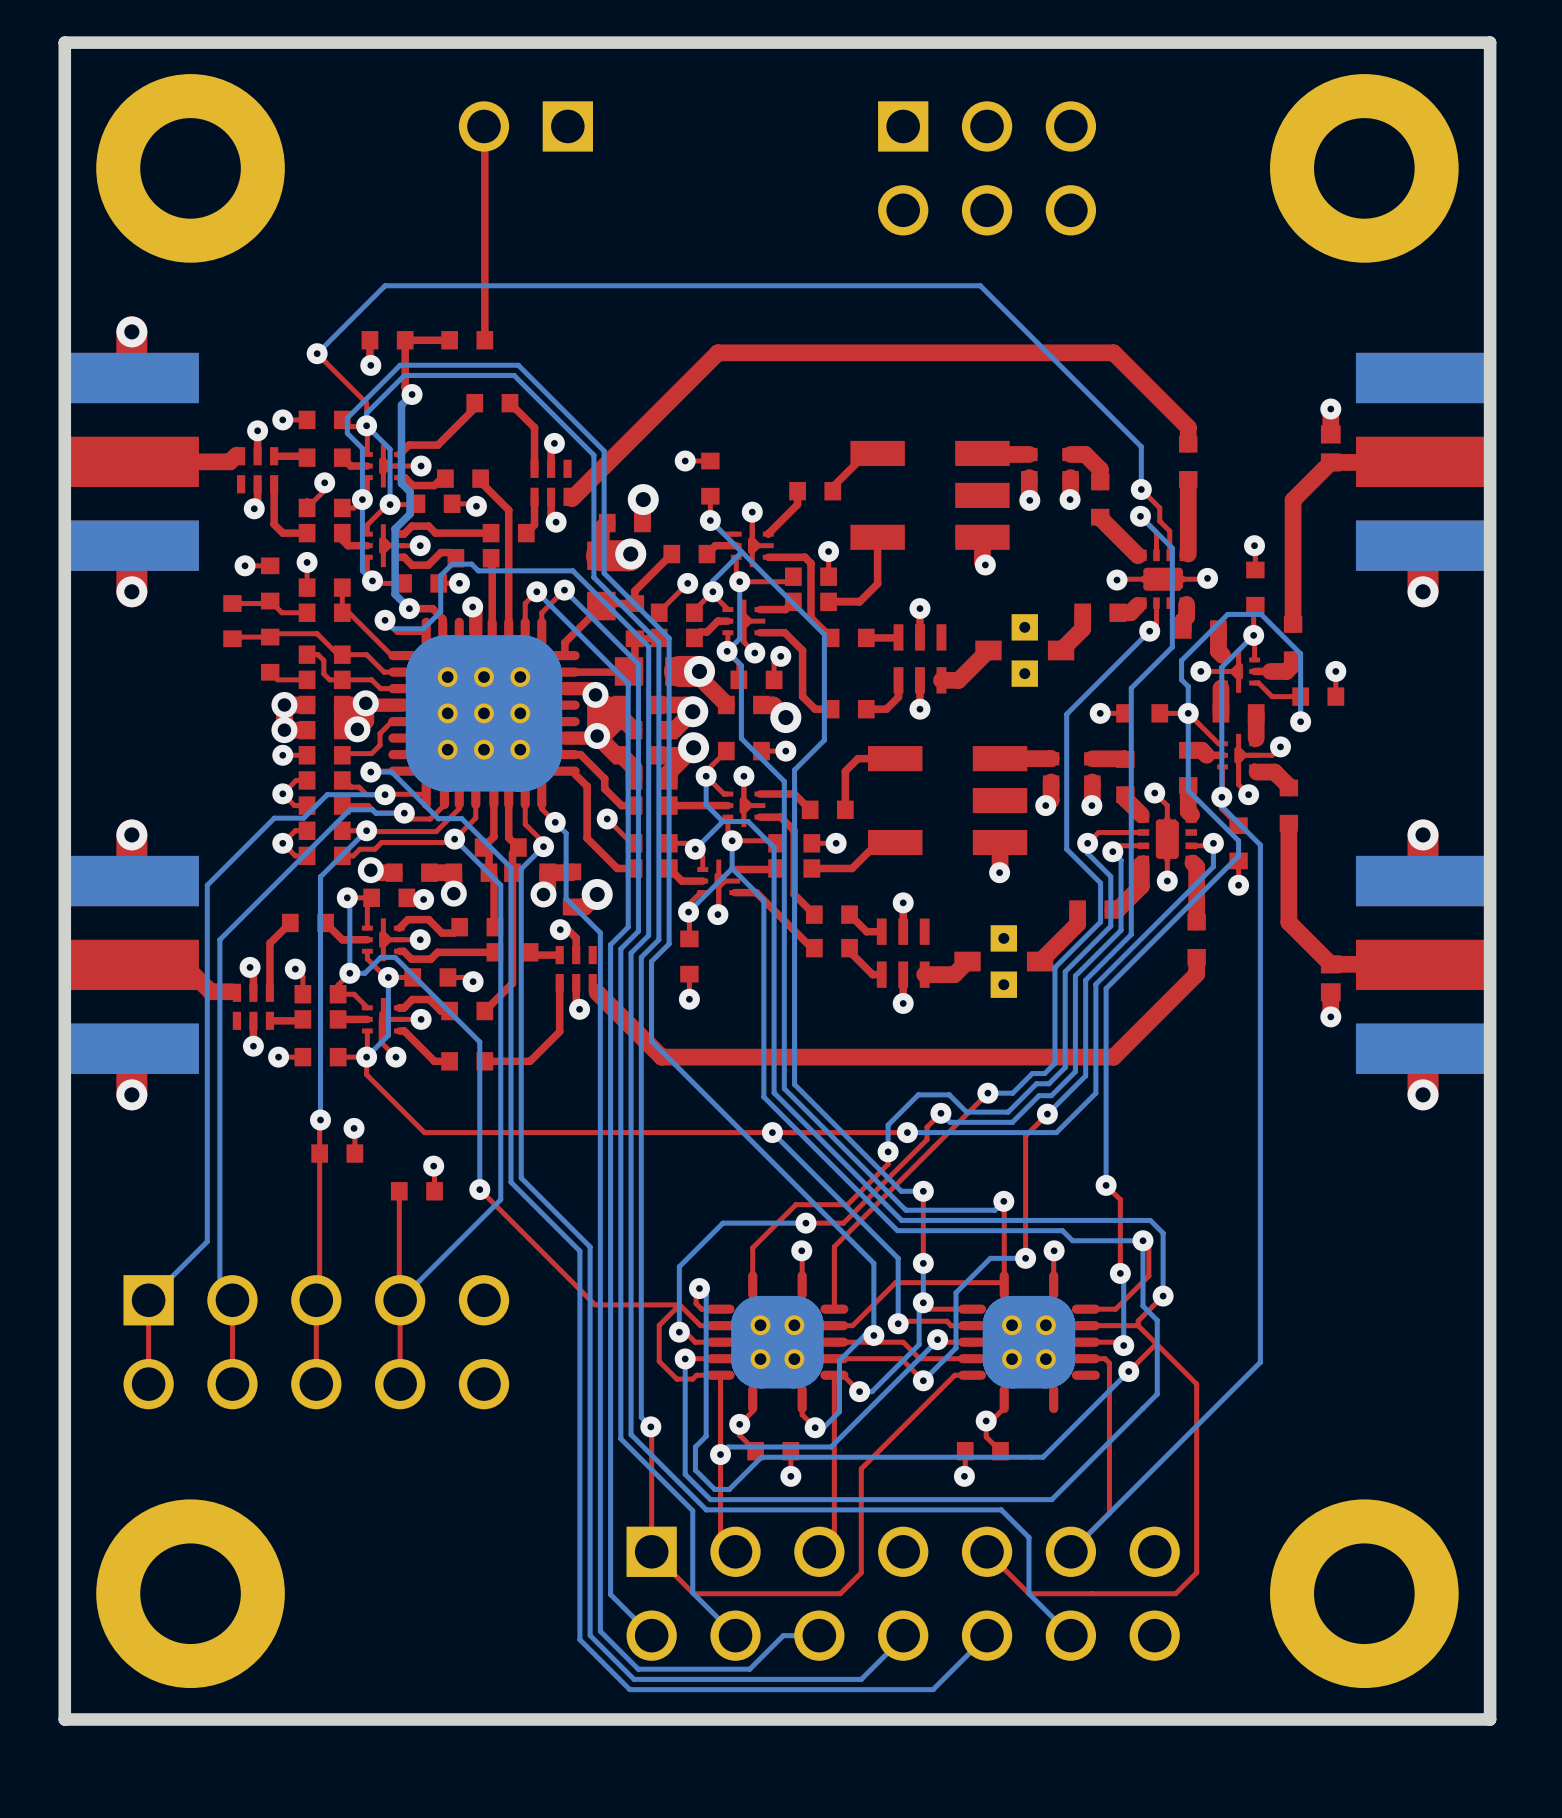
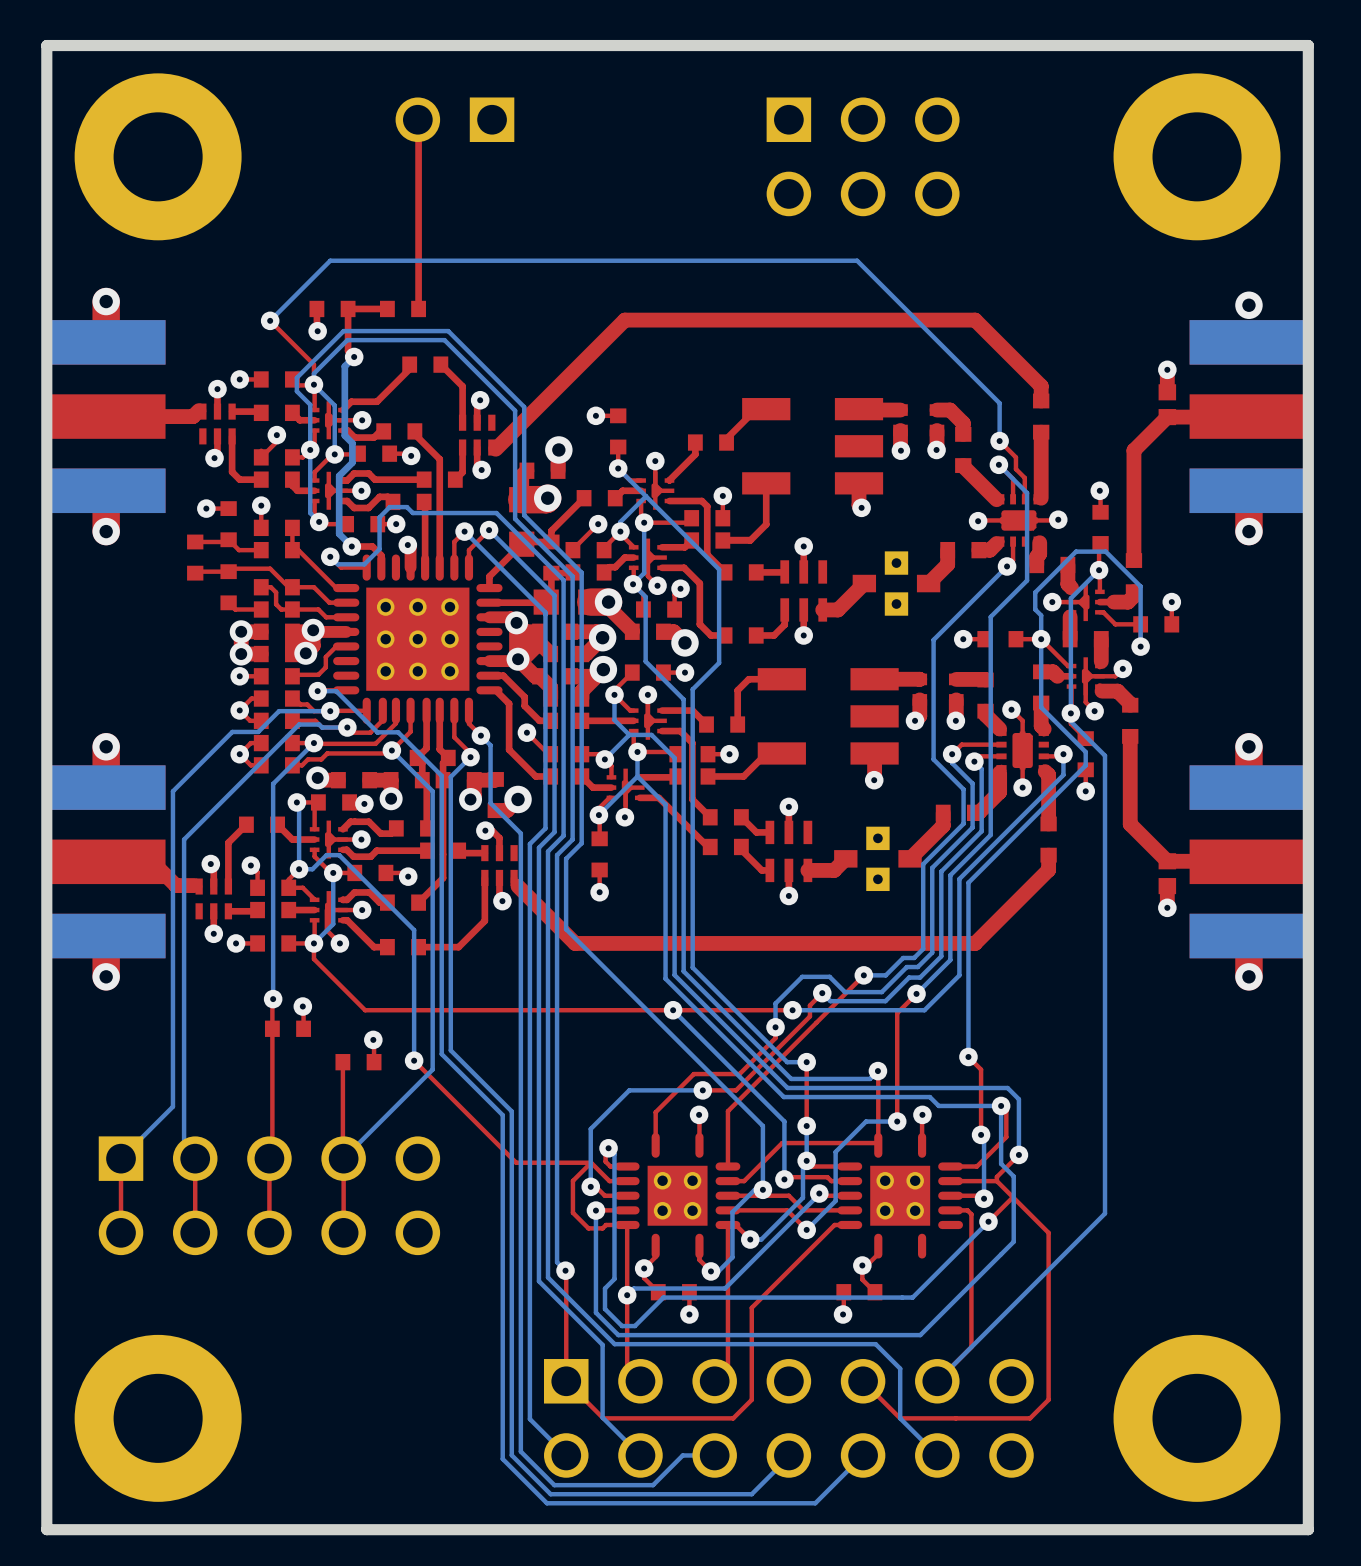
via: none -> (1248, 305)
bottom track: (520, 677) (520, 749) (447, 749) (447, 677) (520, 677) -> none
bottom track: (794, 1325) (760, 1325) (760, 1359) (794, 1359) (794, 1325) -> none
bottom track: (1045, 1325) (1012, 1325) (1012, 1359) (1045, 1359) (1045, 1325) -> none

